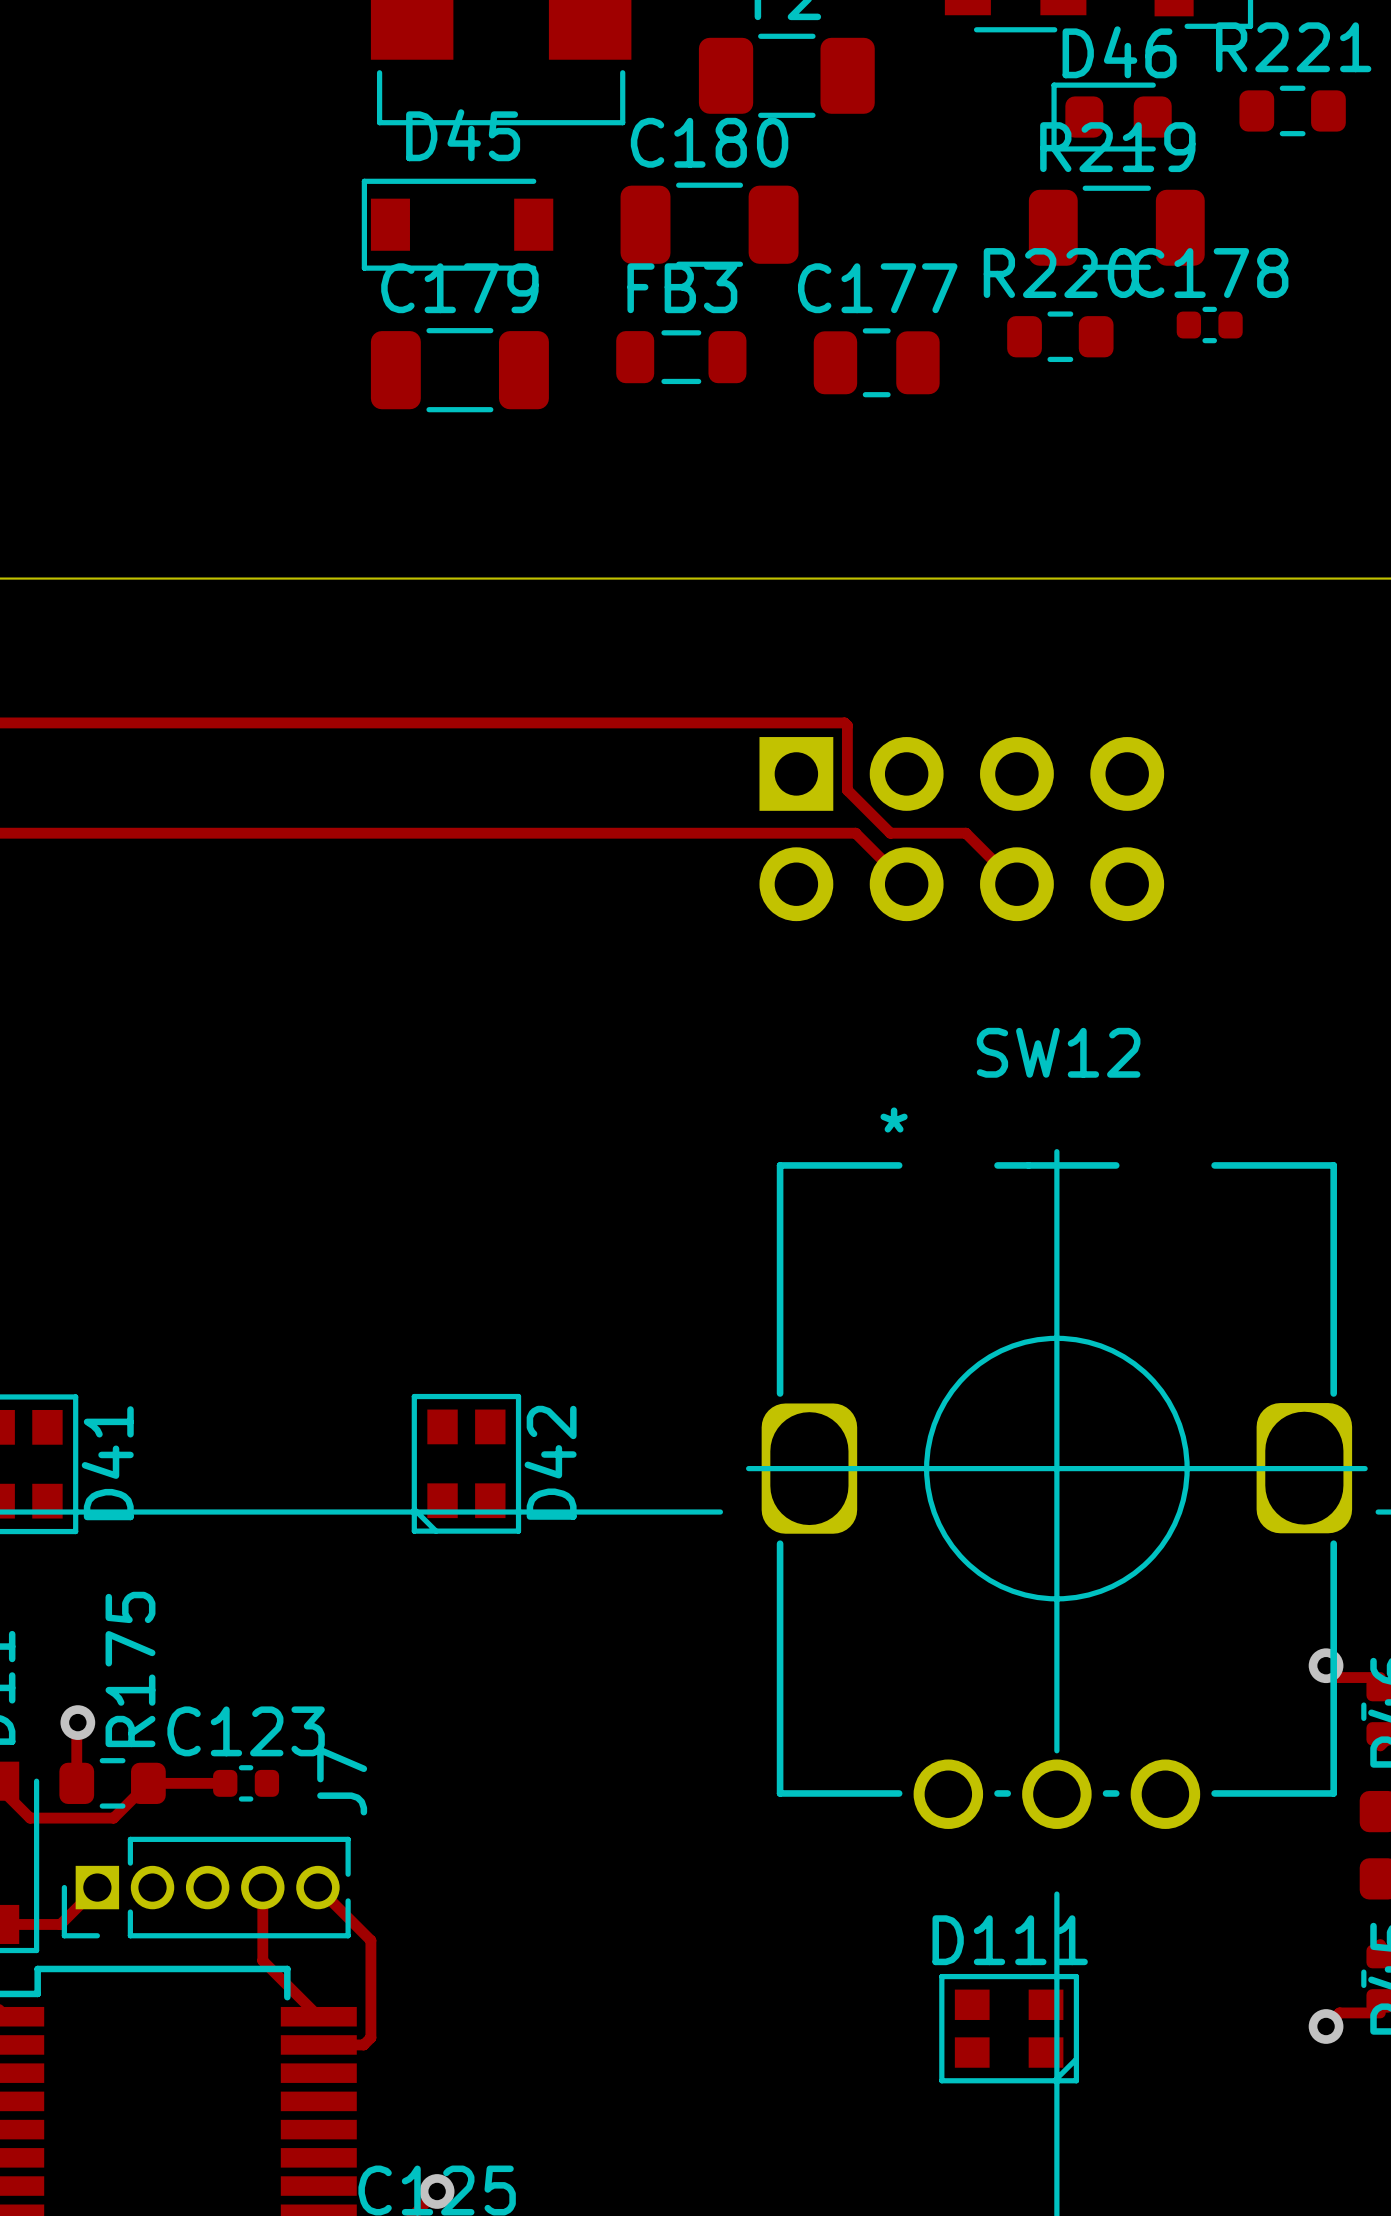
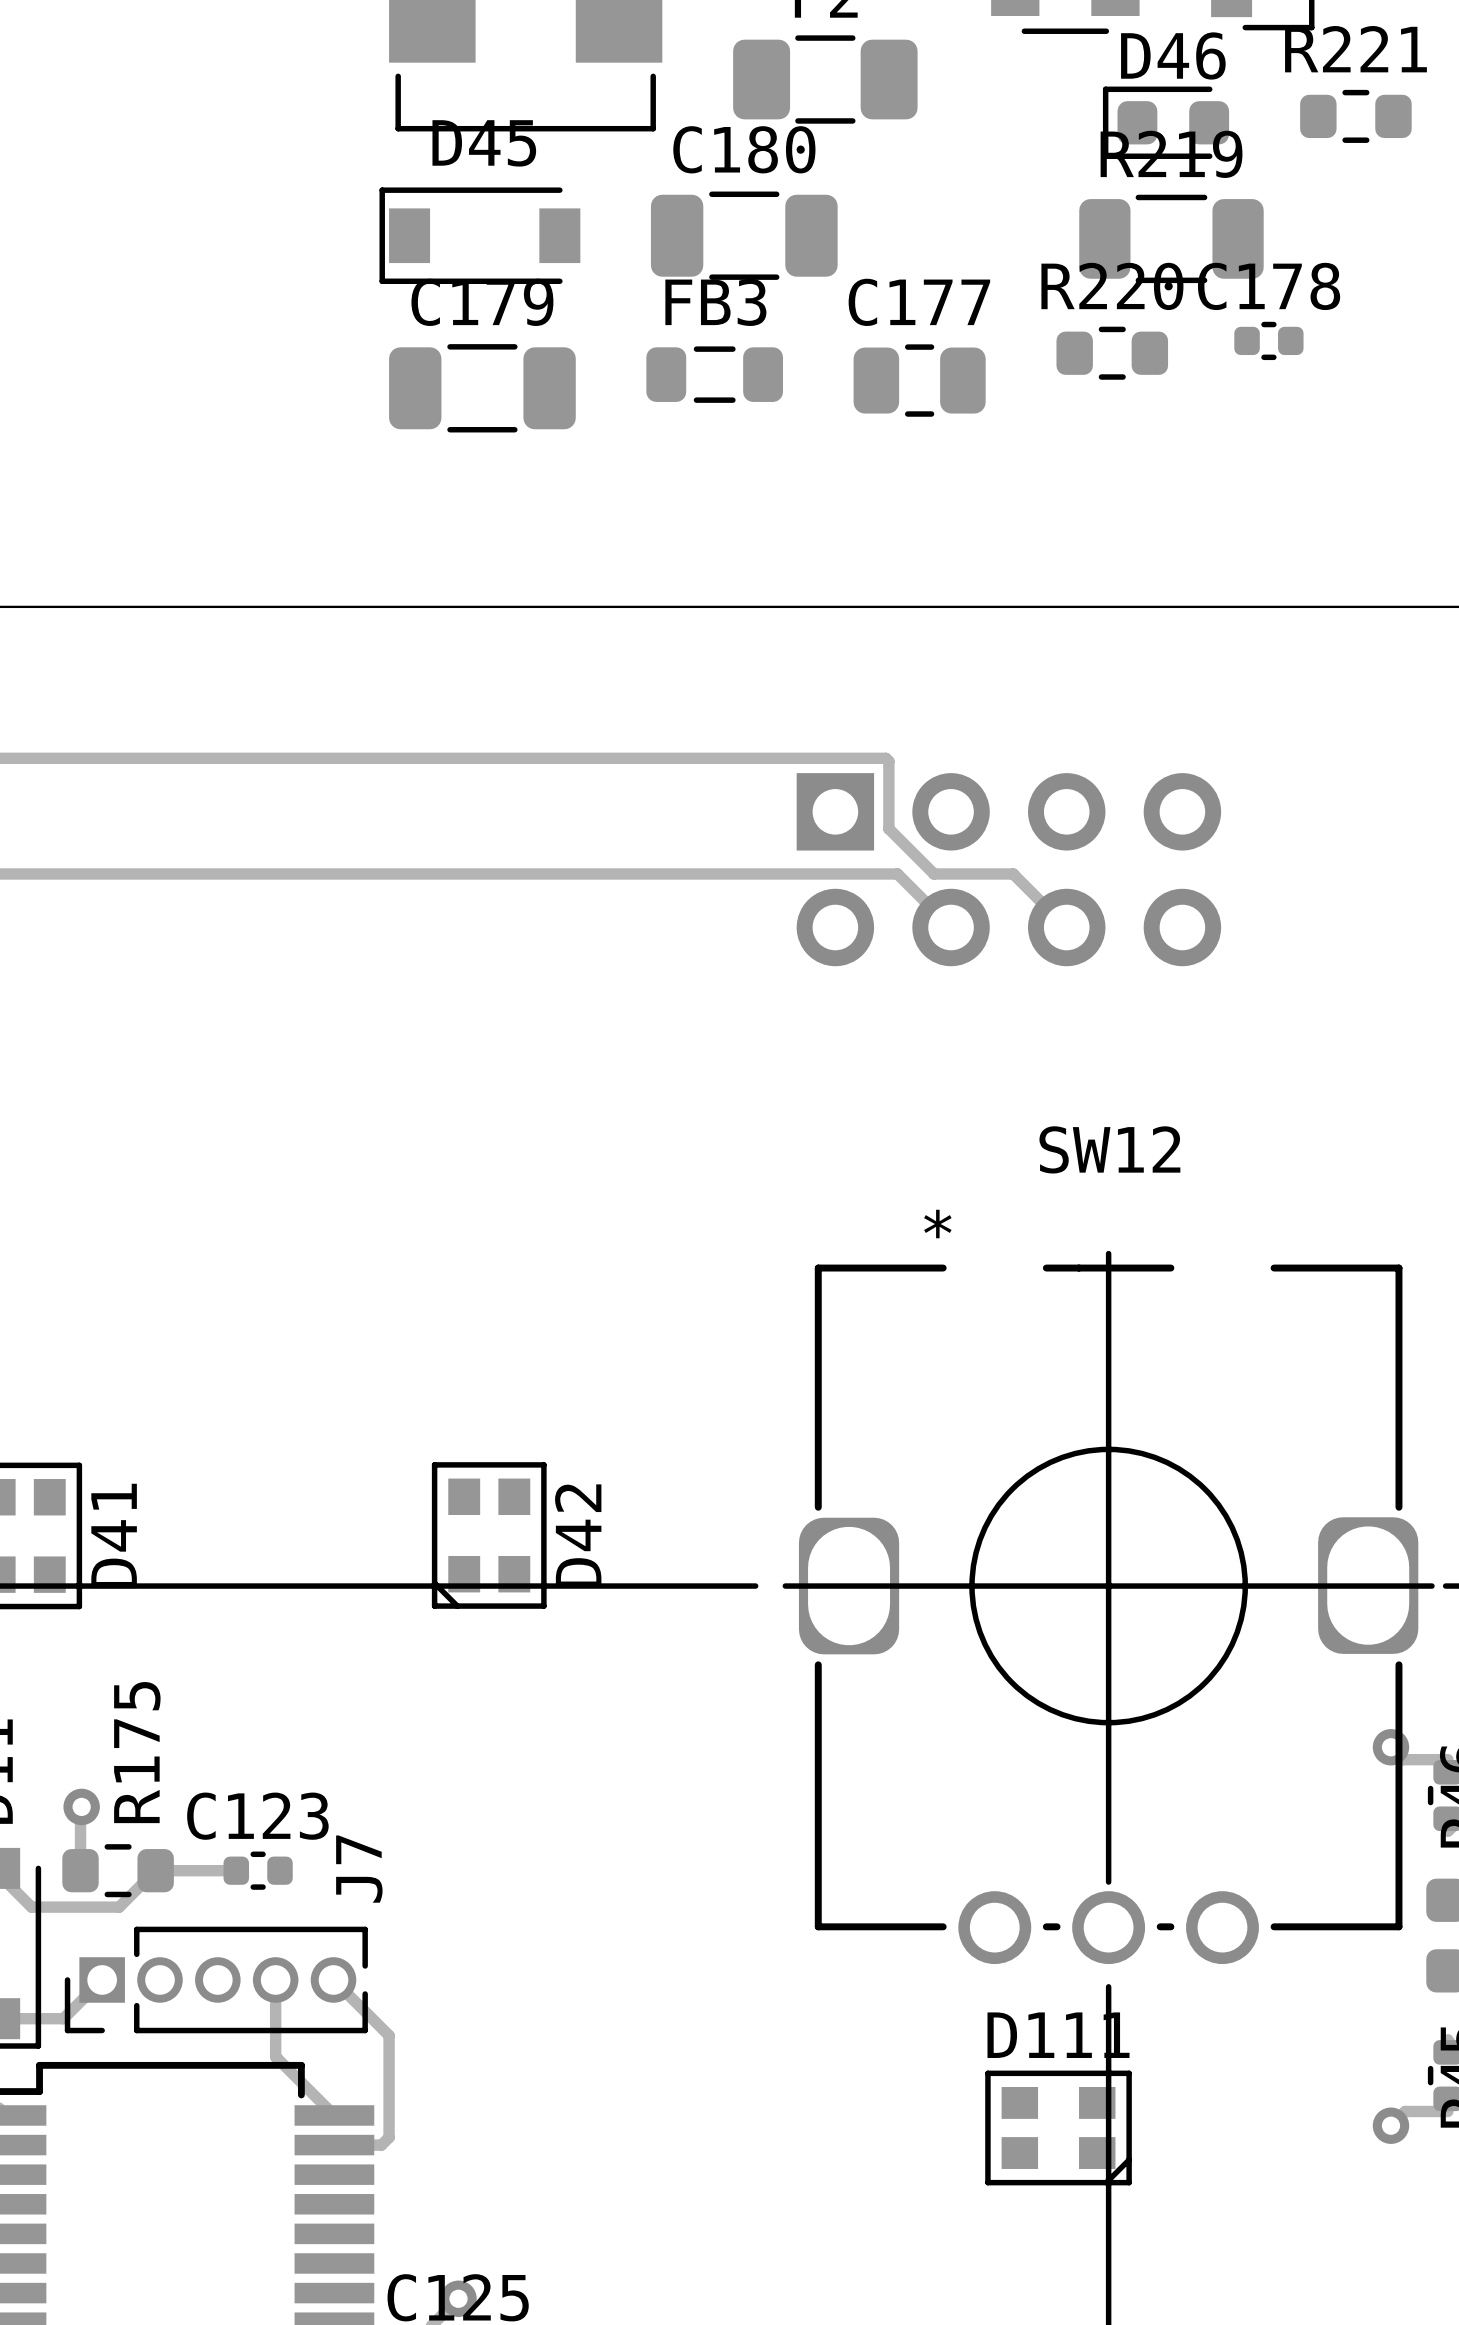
SW12 position: (1056, 1489) -> (1108, 1607)

